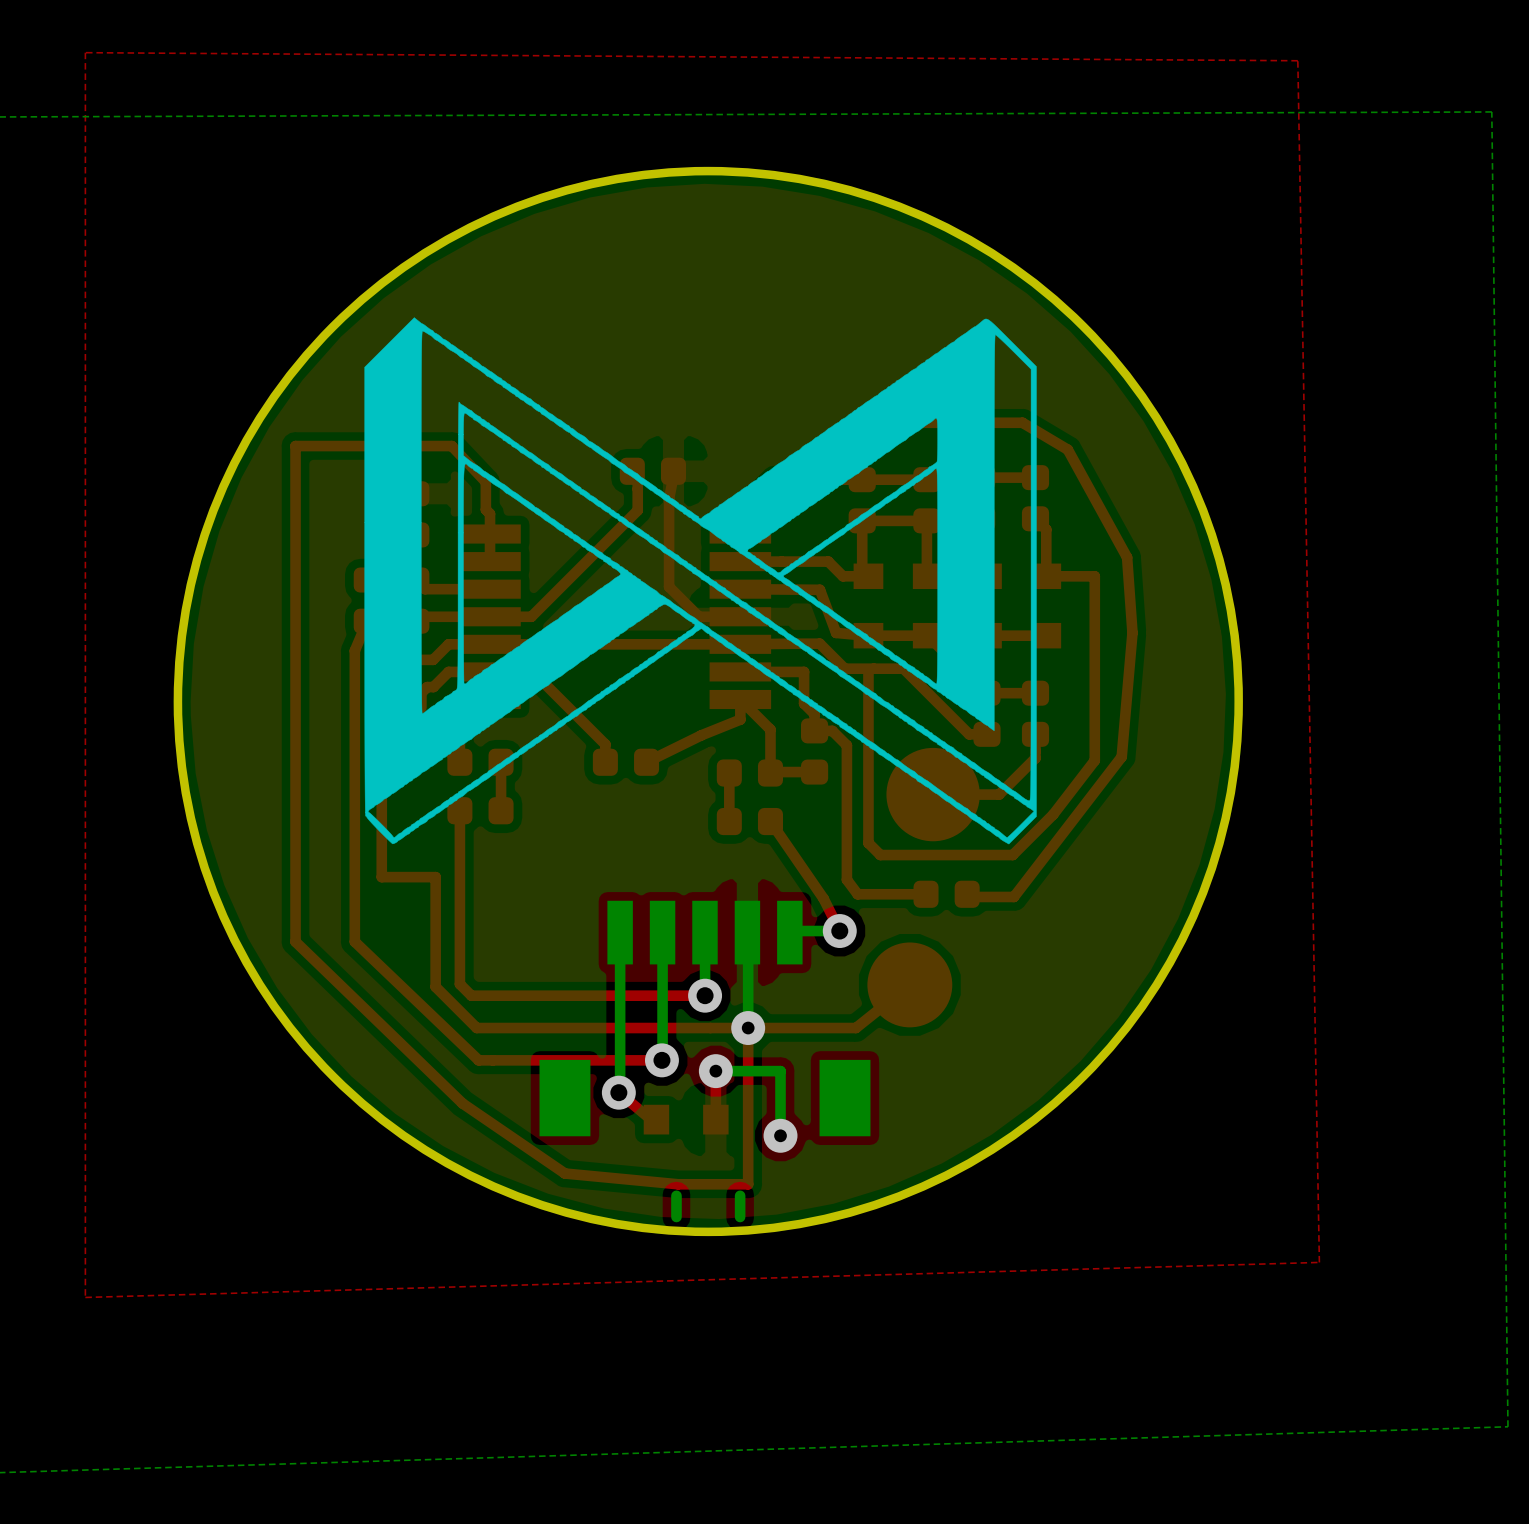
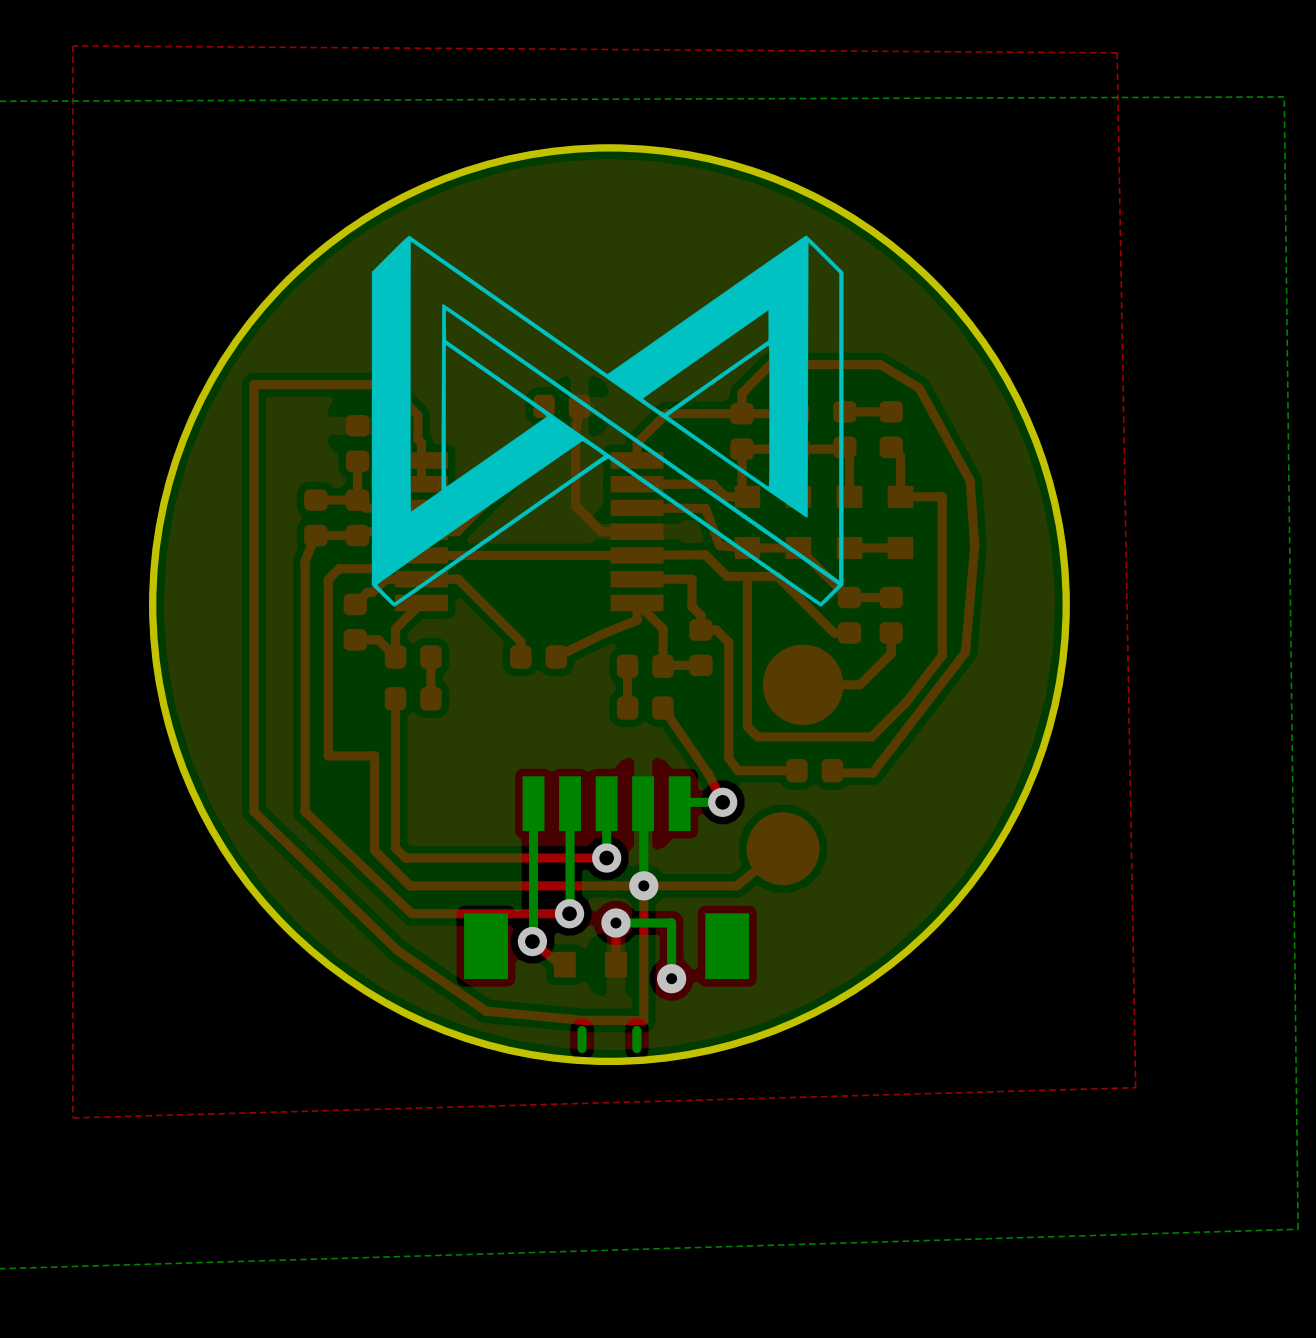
drawing: none -> [371, 235, 844, 607]
drawing: [364, 317, 1037, 845] -> none

